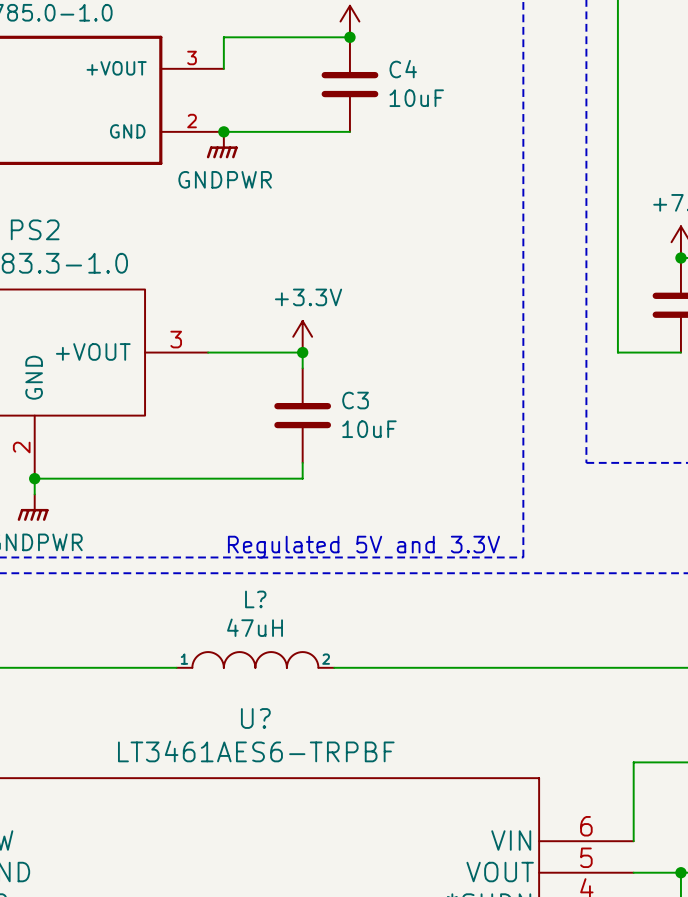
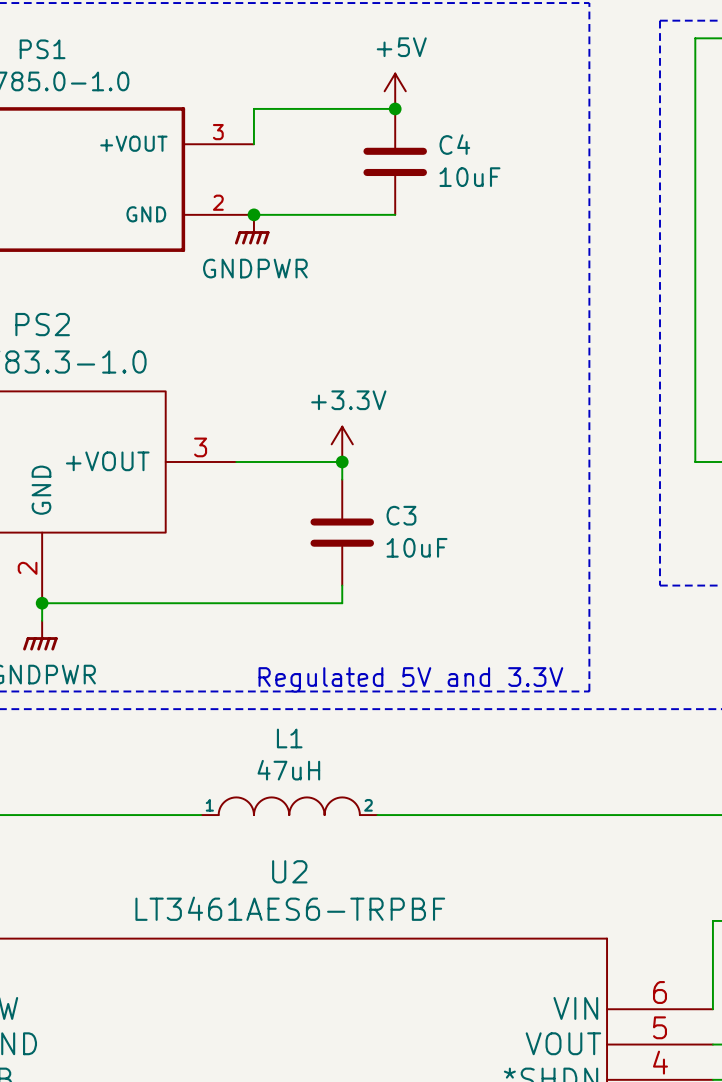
L? name: L? (255, 599) -> L1 (289, 738)
U? name: U? (255, 718) -> U2 (289, 871)

